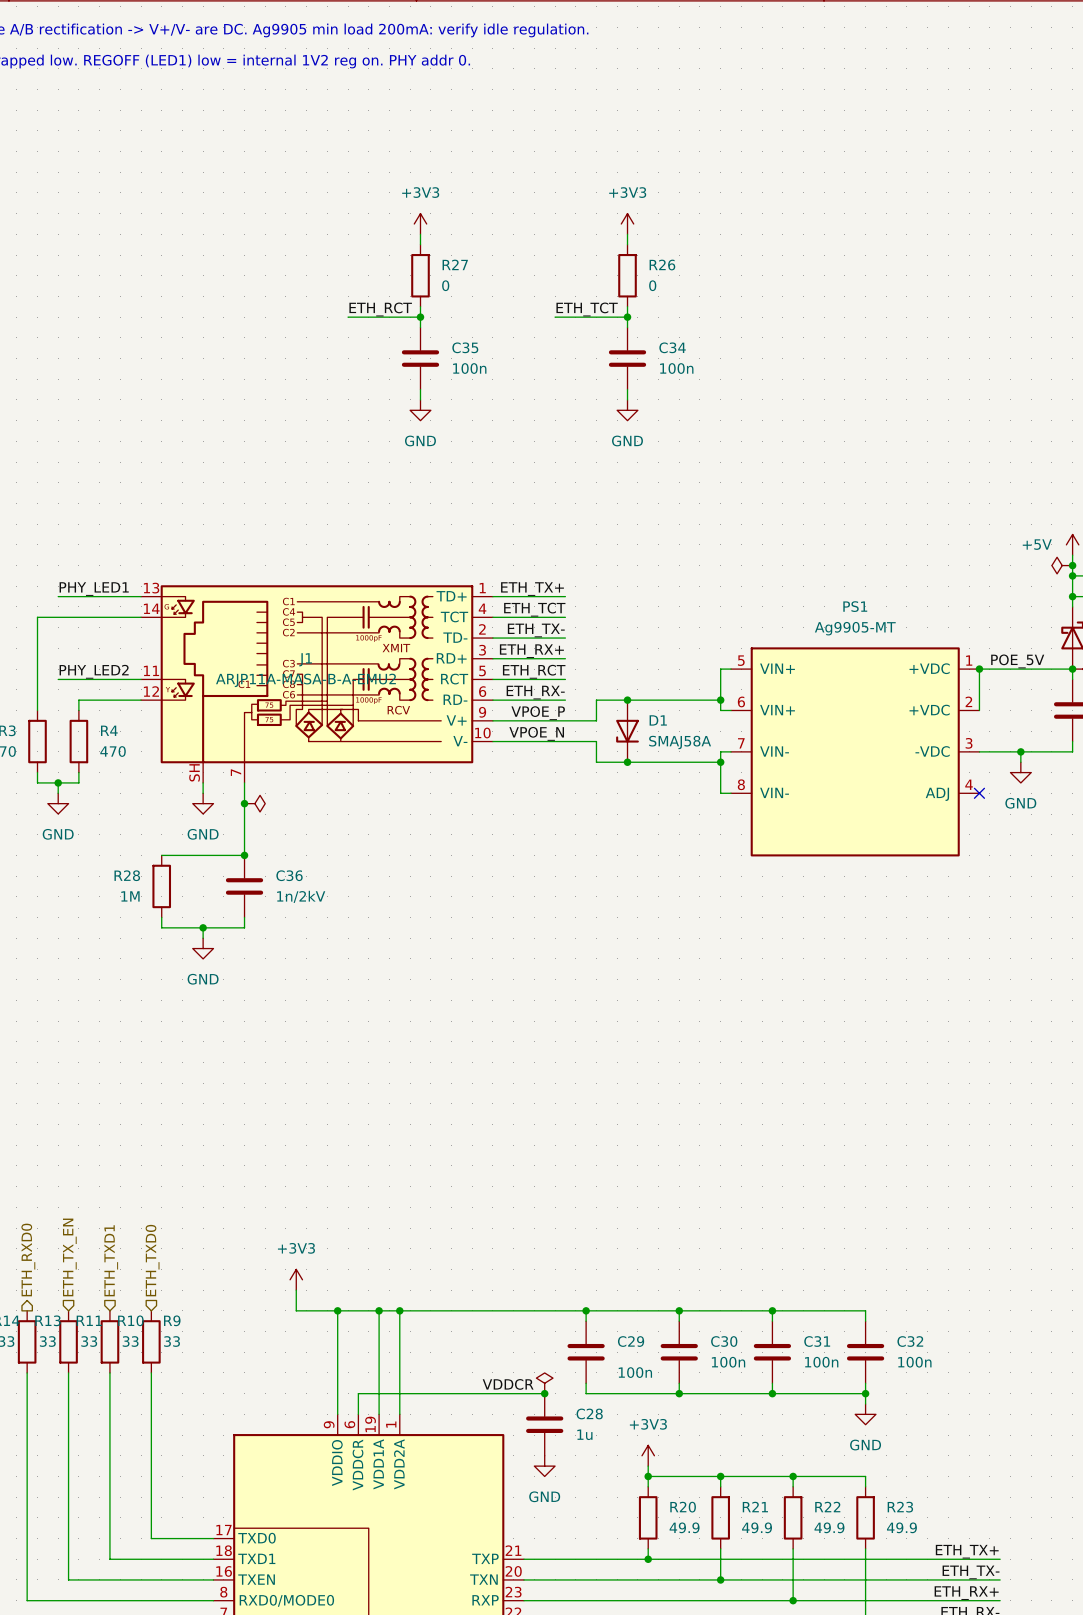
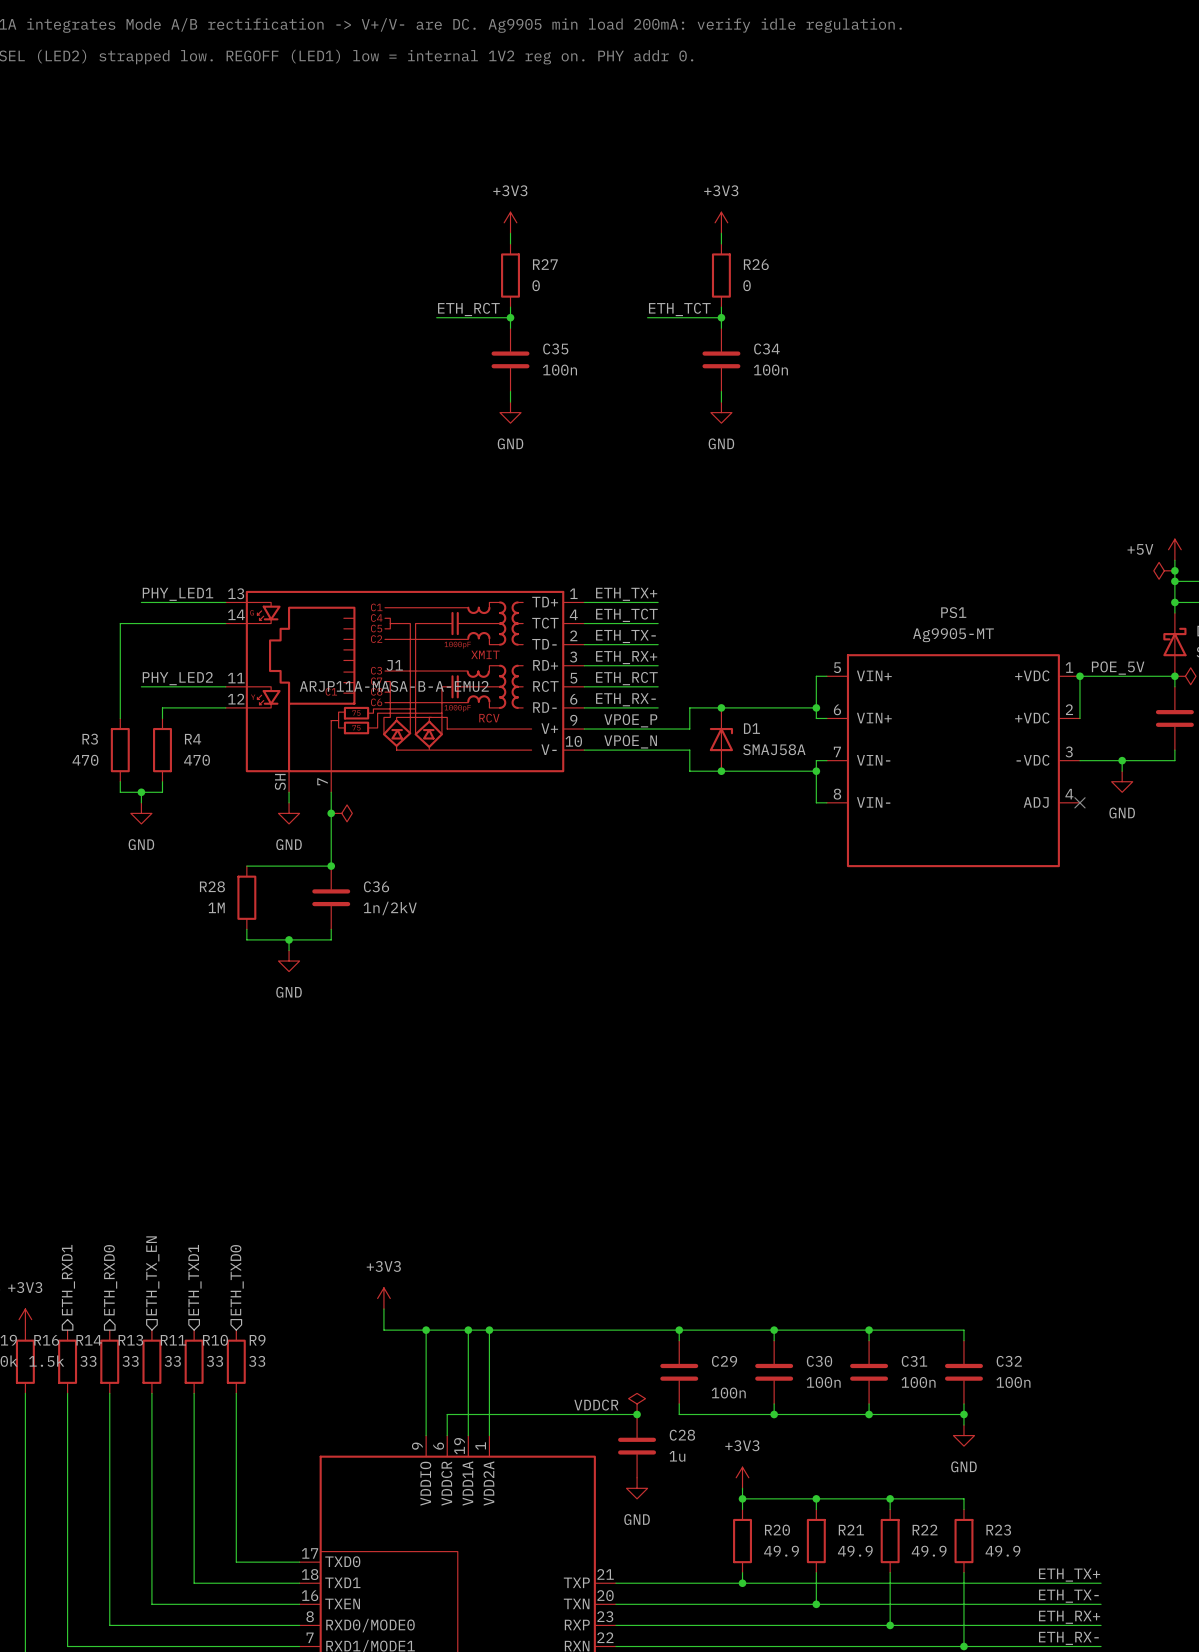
D1 rotation: 0° (627, 731) -> 180° (721, 739)

